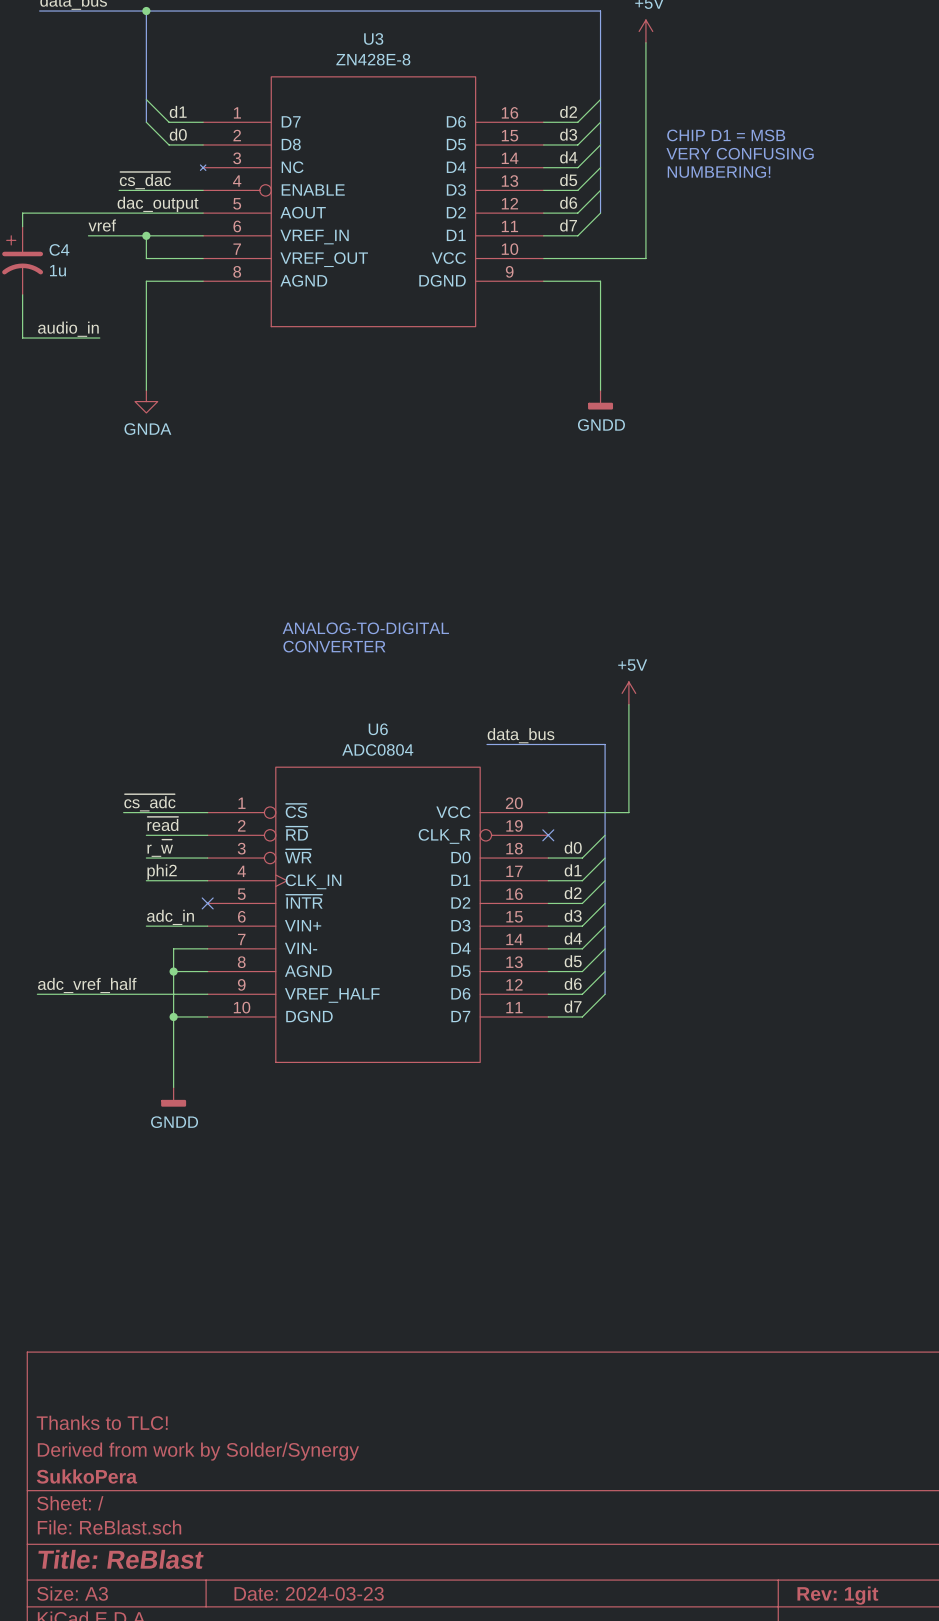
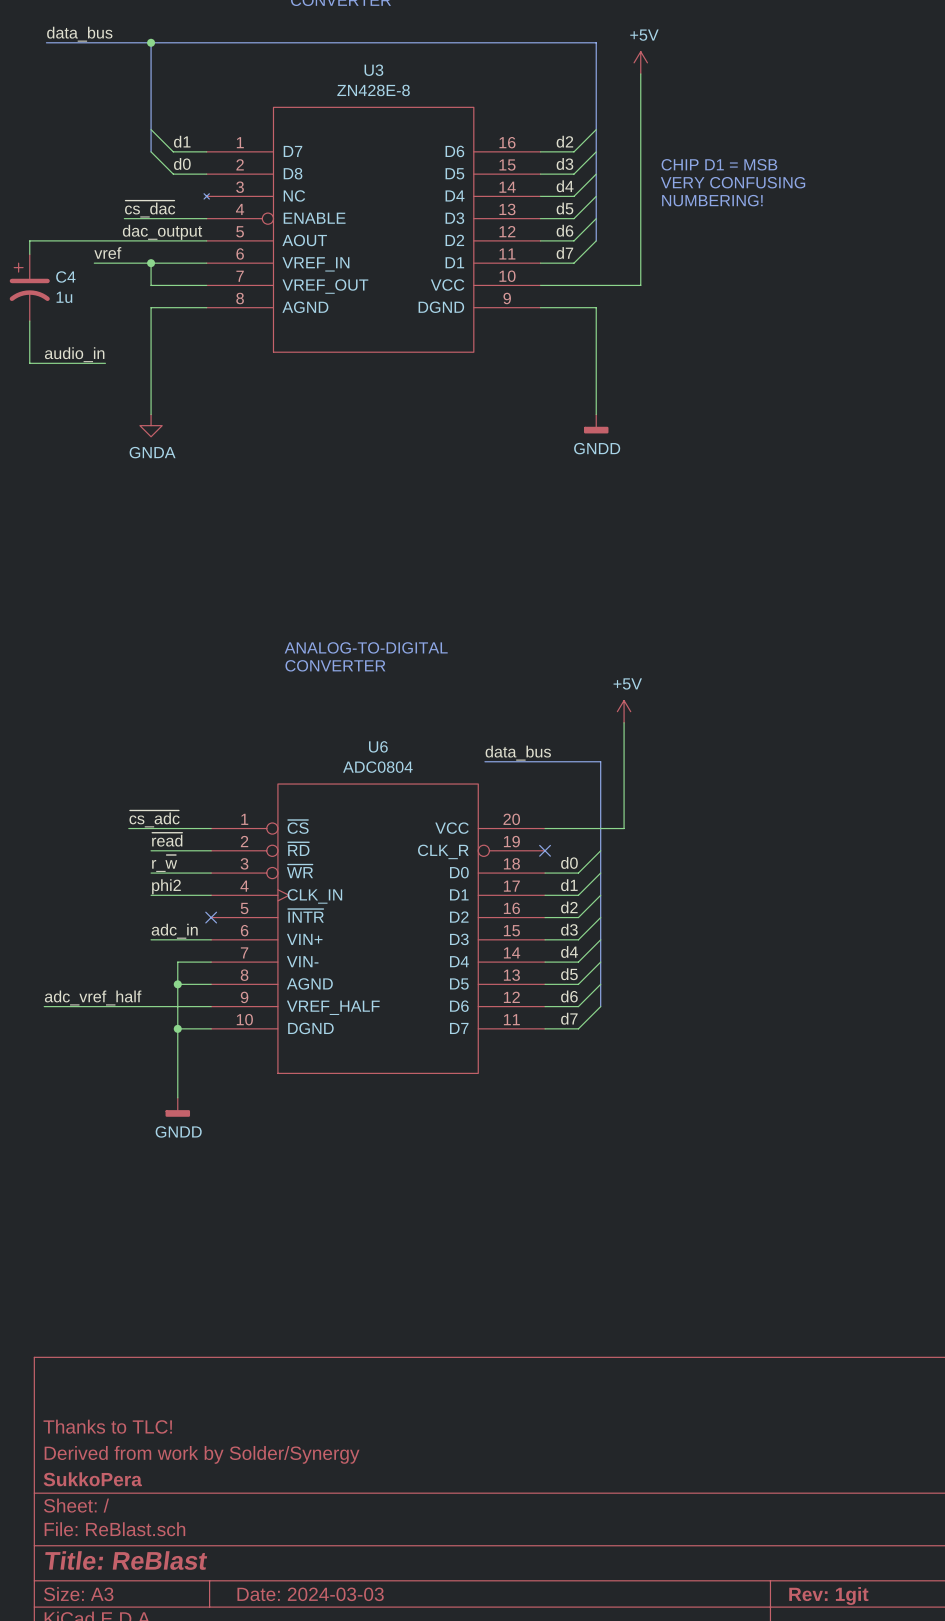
title block: Date: 2024-03-23 (309, 1593) -> Date: 2024-03-03 (310, 1594)

